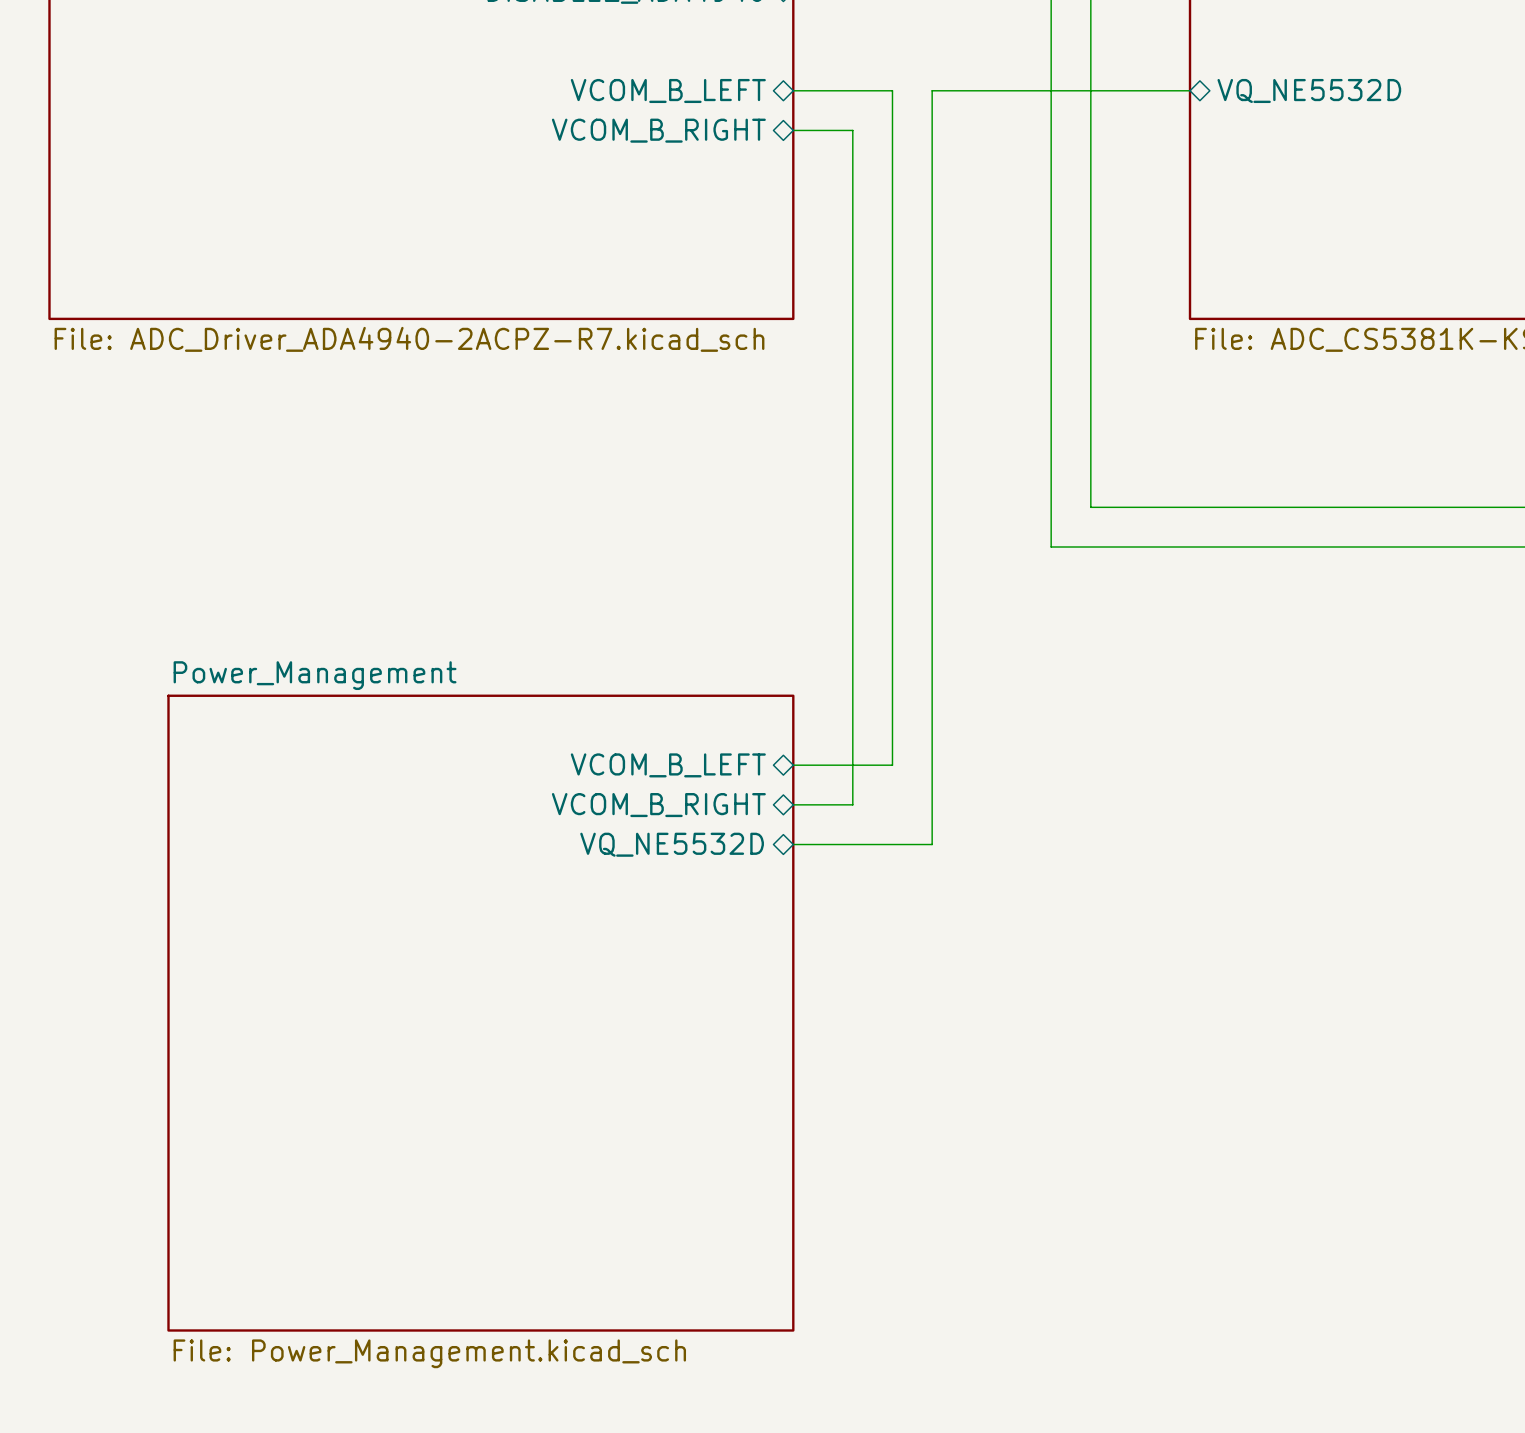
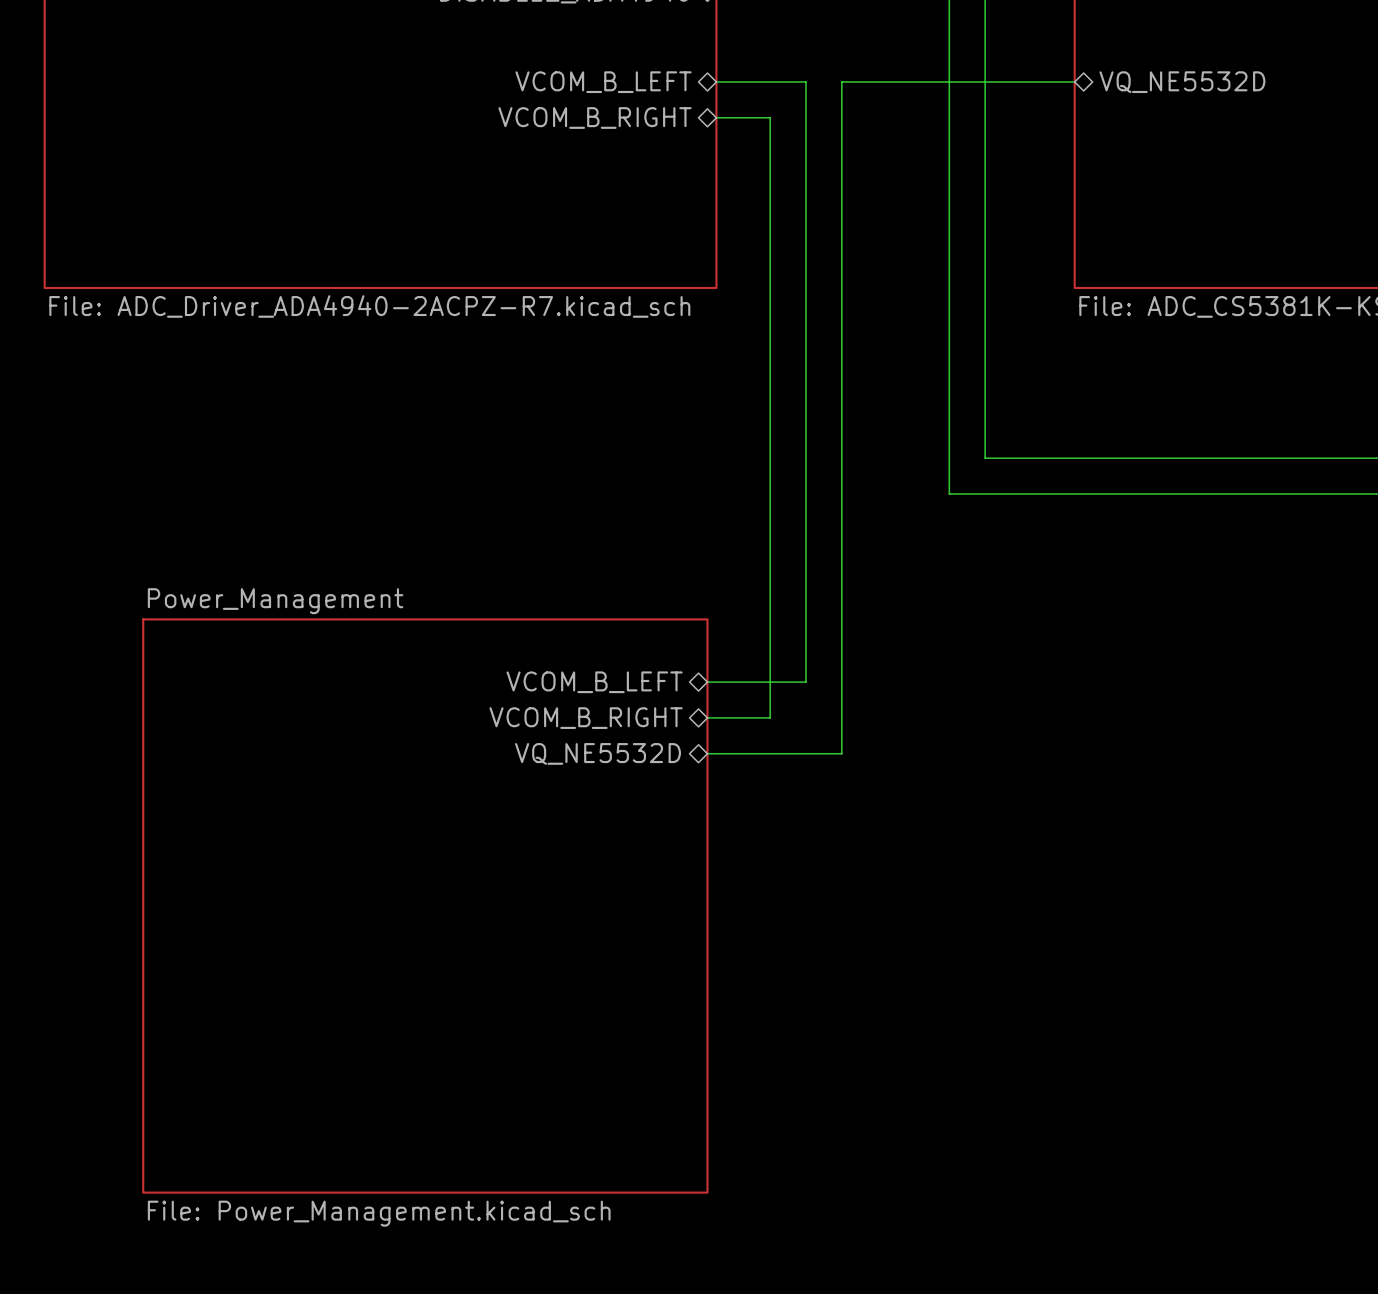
wire: (892, 755) (892, 765) (793, 765) -> (806, 682) (707, 682)
sheet pin position: VCOM_B_LEFT (668, 765) -> VCOM_B_LEFT (594, 682)
wire: (852, 794) (852, 804) (793, 804) -> (770, 717) (707, 717)
sheet pin position: VCOM_B_RIGHT (658, 805) -> VCOM_B_RIGHT (586, 718)
wire: (932, 834) (932, 844) (793, 844) -> (841, 753) (707, 753)
sheet pin position: VQ_NE5532D (672, 844) -> VQ_NE5532D (598, 753)
sheet Power_Management position: (480, 1013) -> (425, 906)

